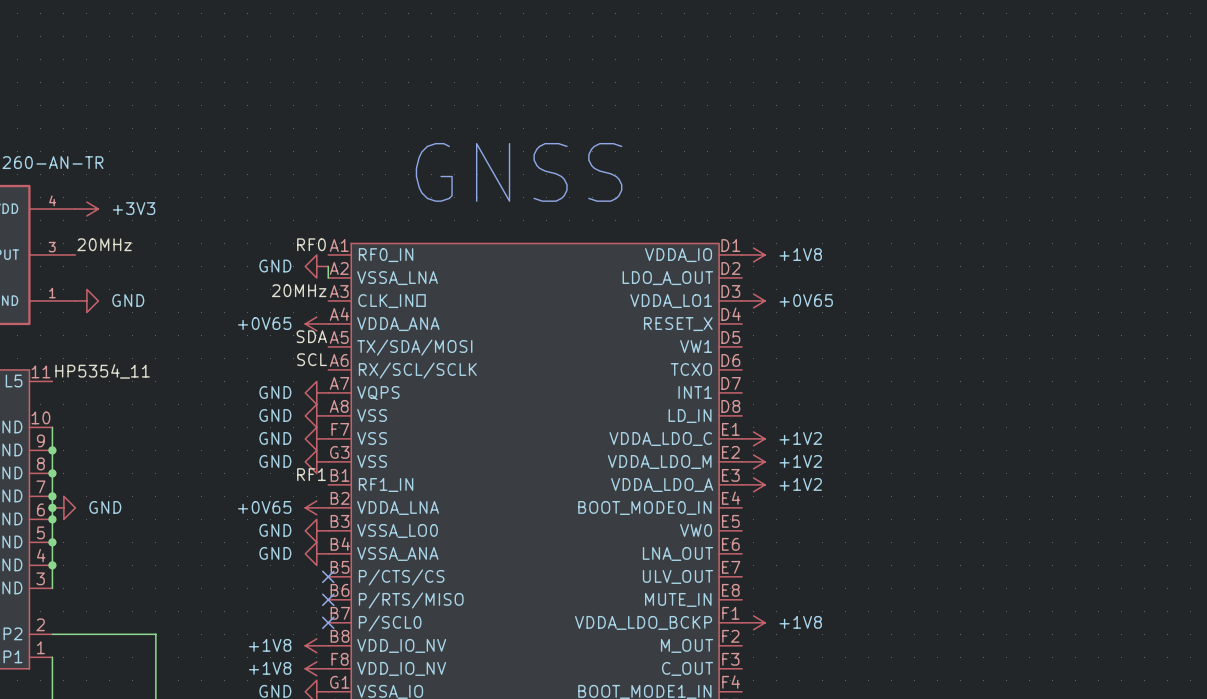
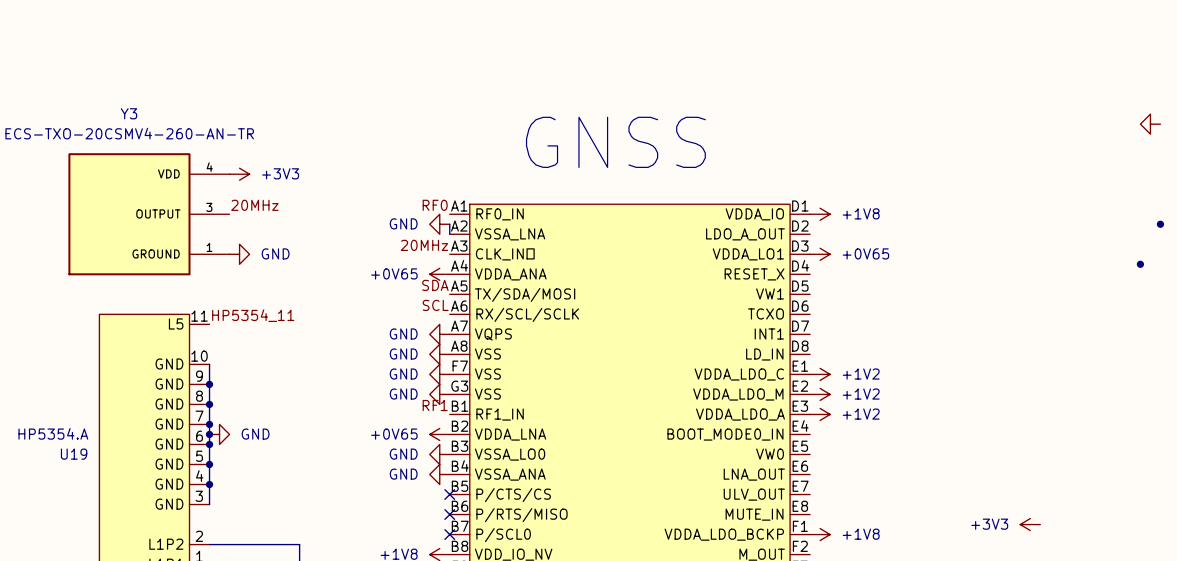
power symbol: none -> (1150, 124)
junction: none -> (1160, 224)
junction: none -> (1140, 264)
power symbol: none -> +3V3 (1030, 524)

